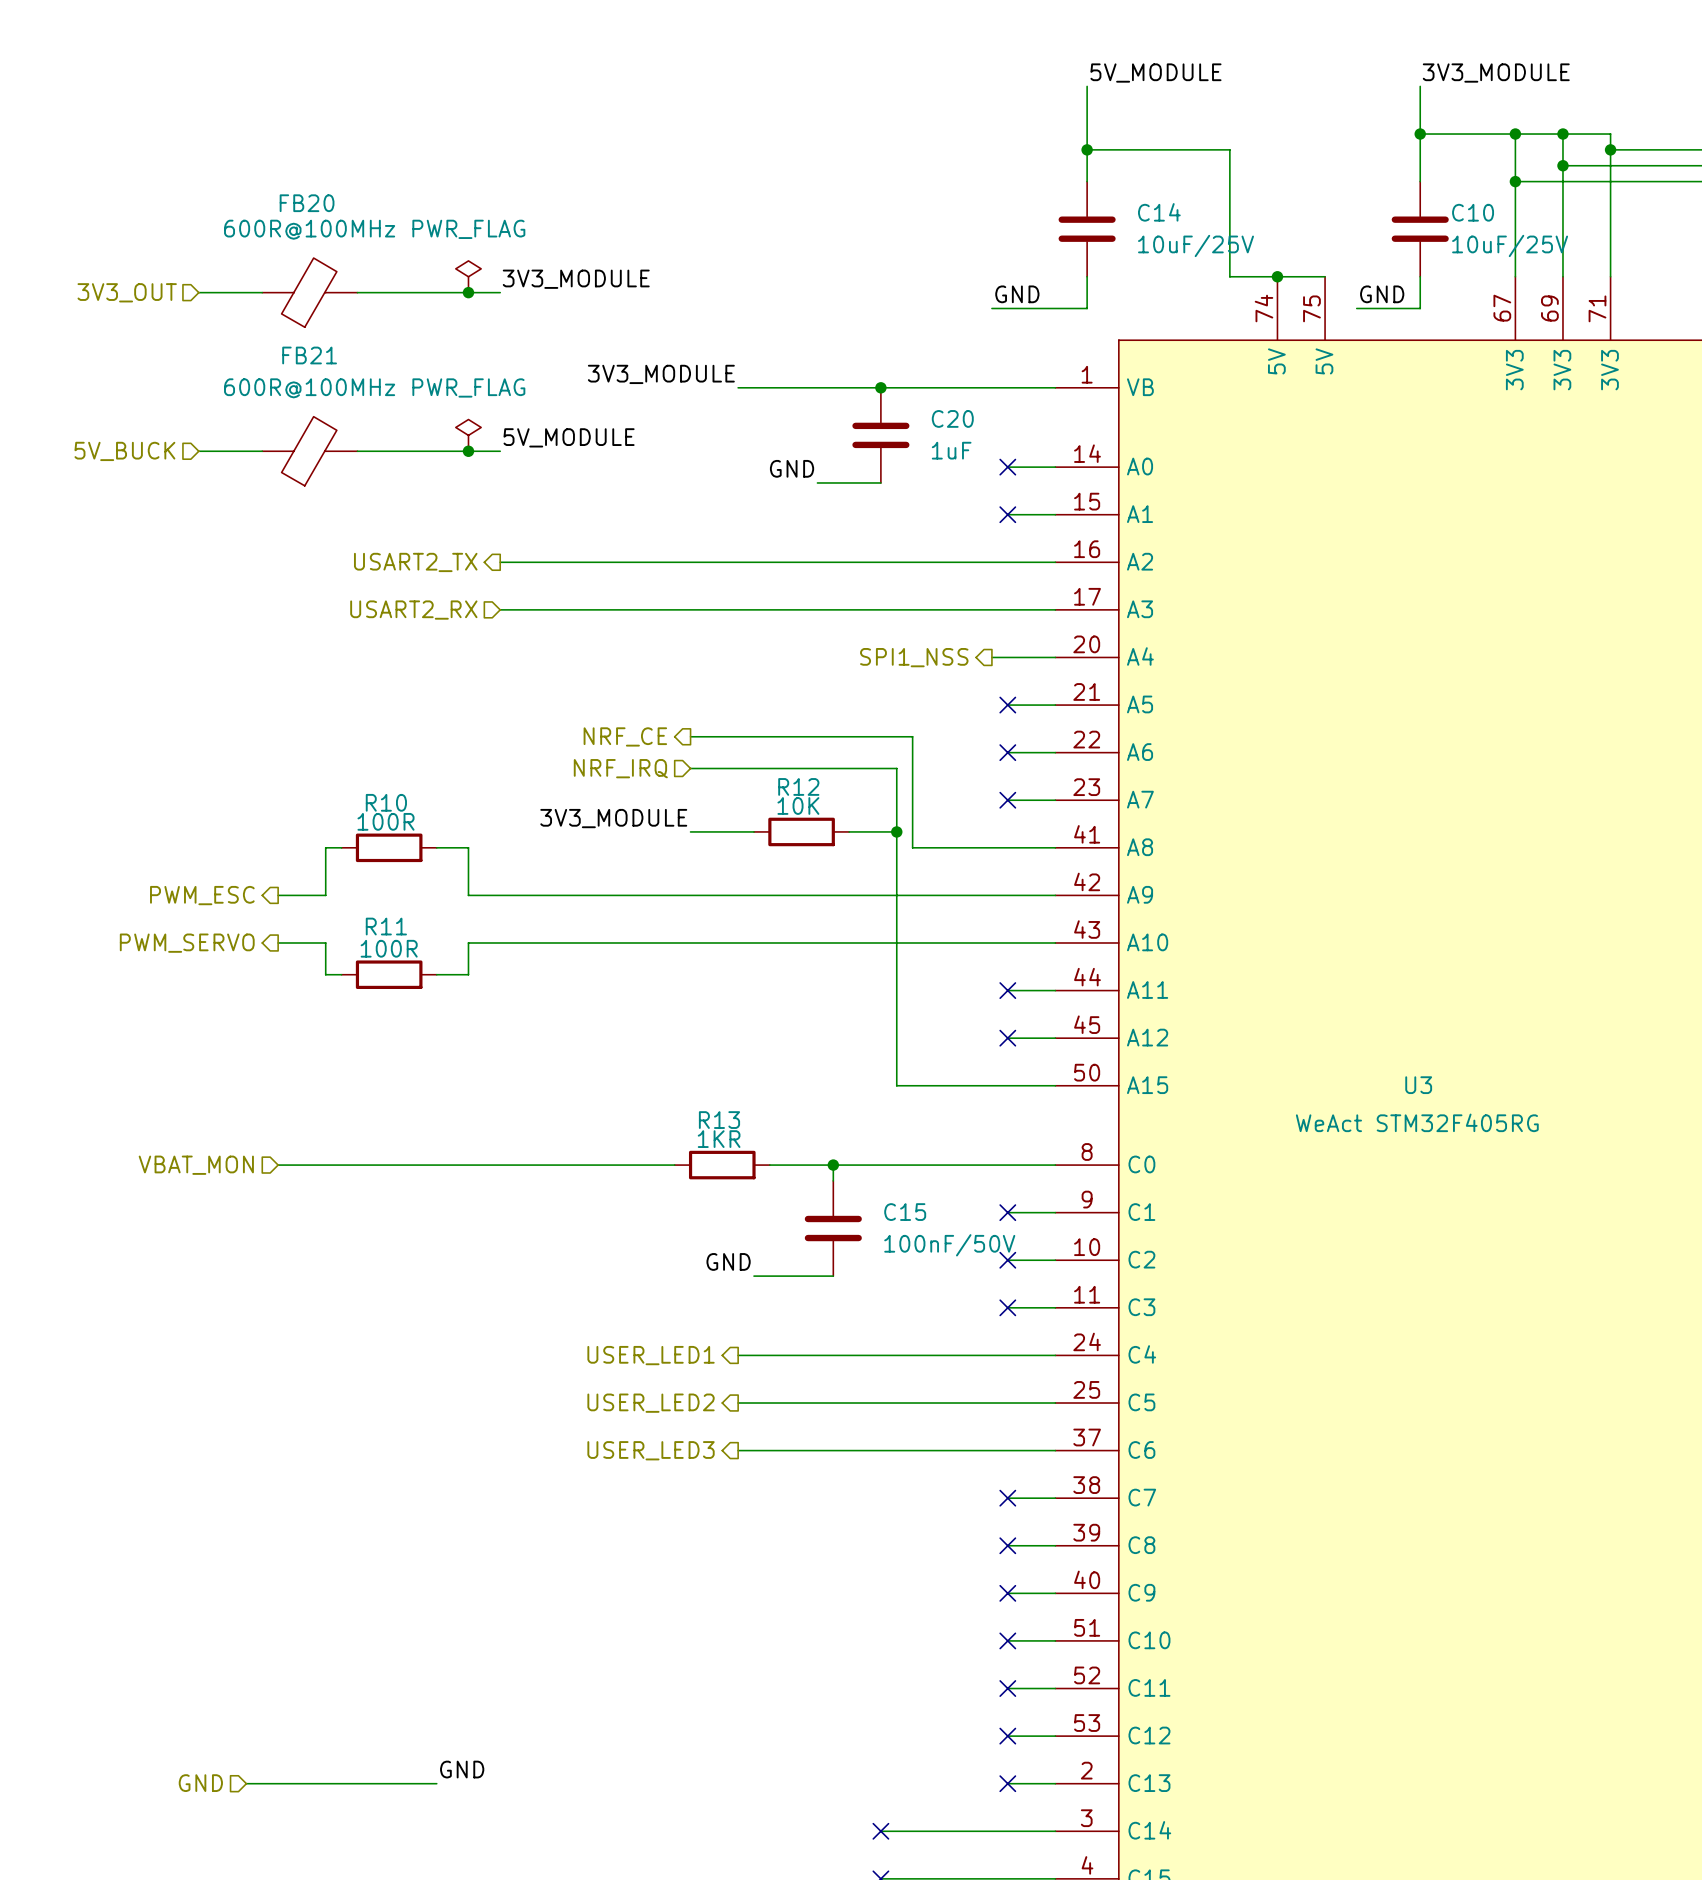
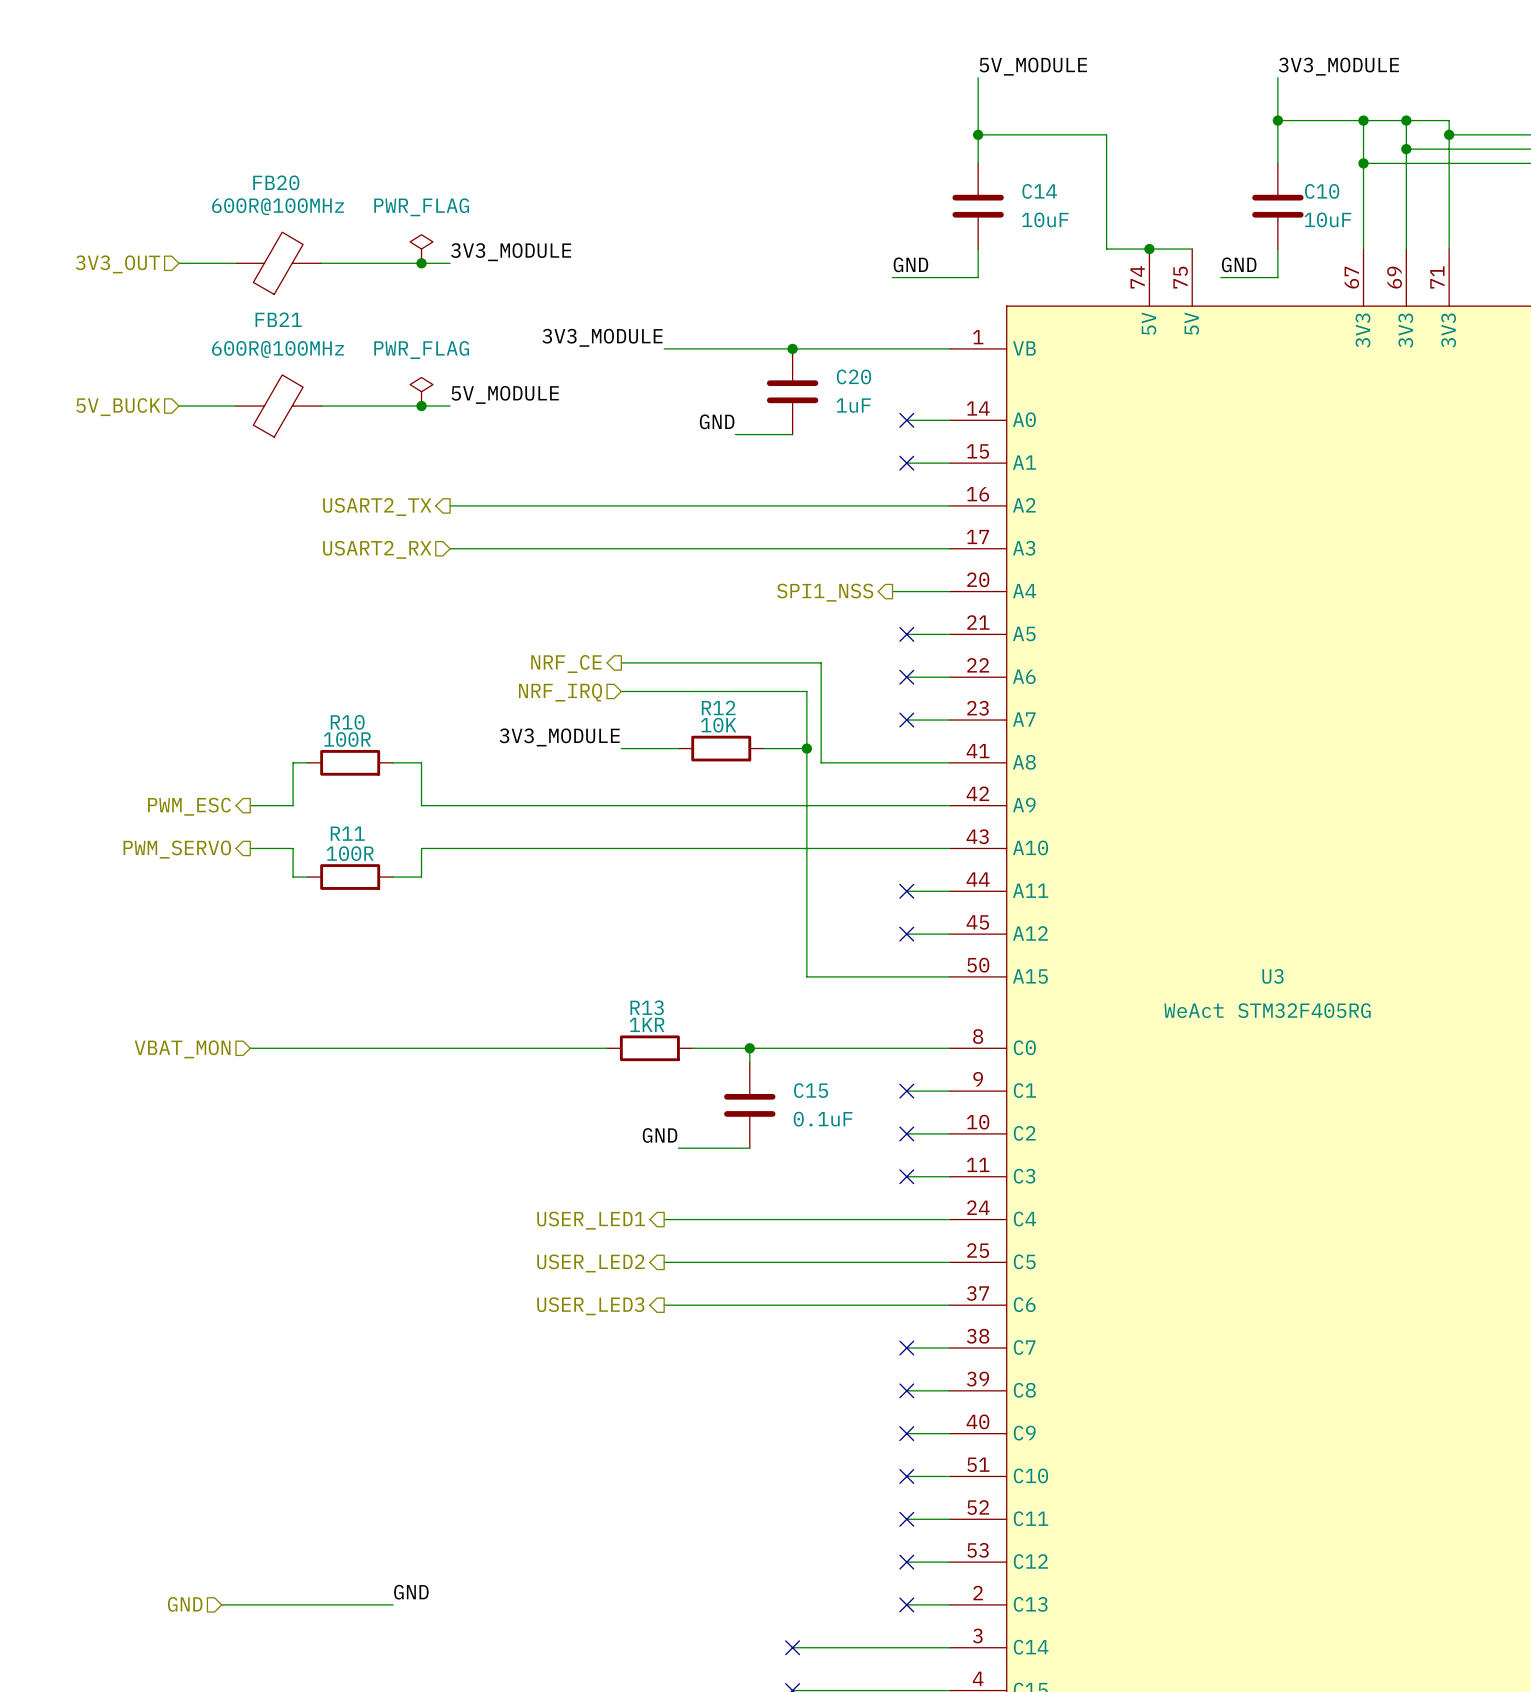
C14 value: 10uF/25V (1196, 245) -> 10uF (1045, 219)
C10 value: 10uF/25V (1510, 245) -> 10uF (1327, 219)
C15 value: 100nF/50V (949, 1245) -> 0.1uF (823, 1119)

